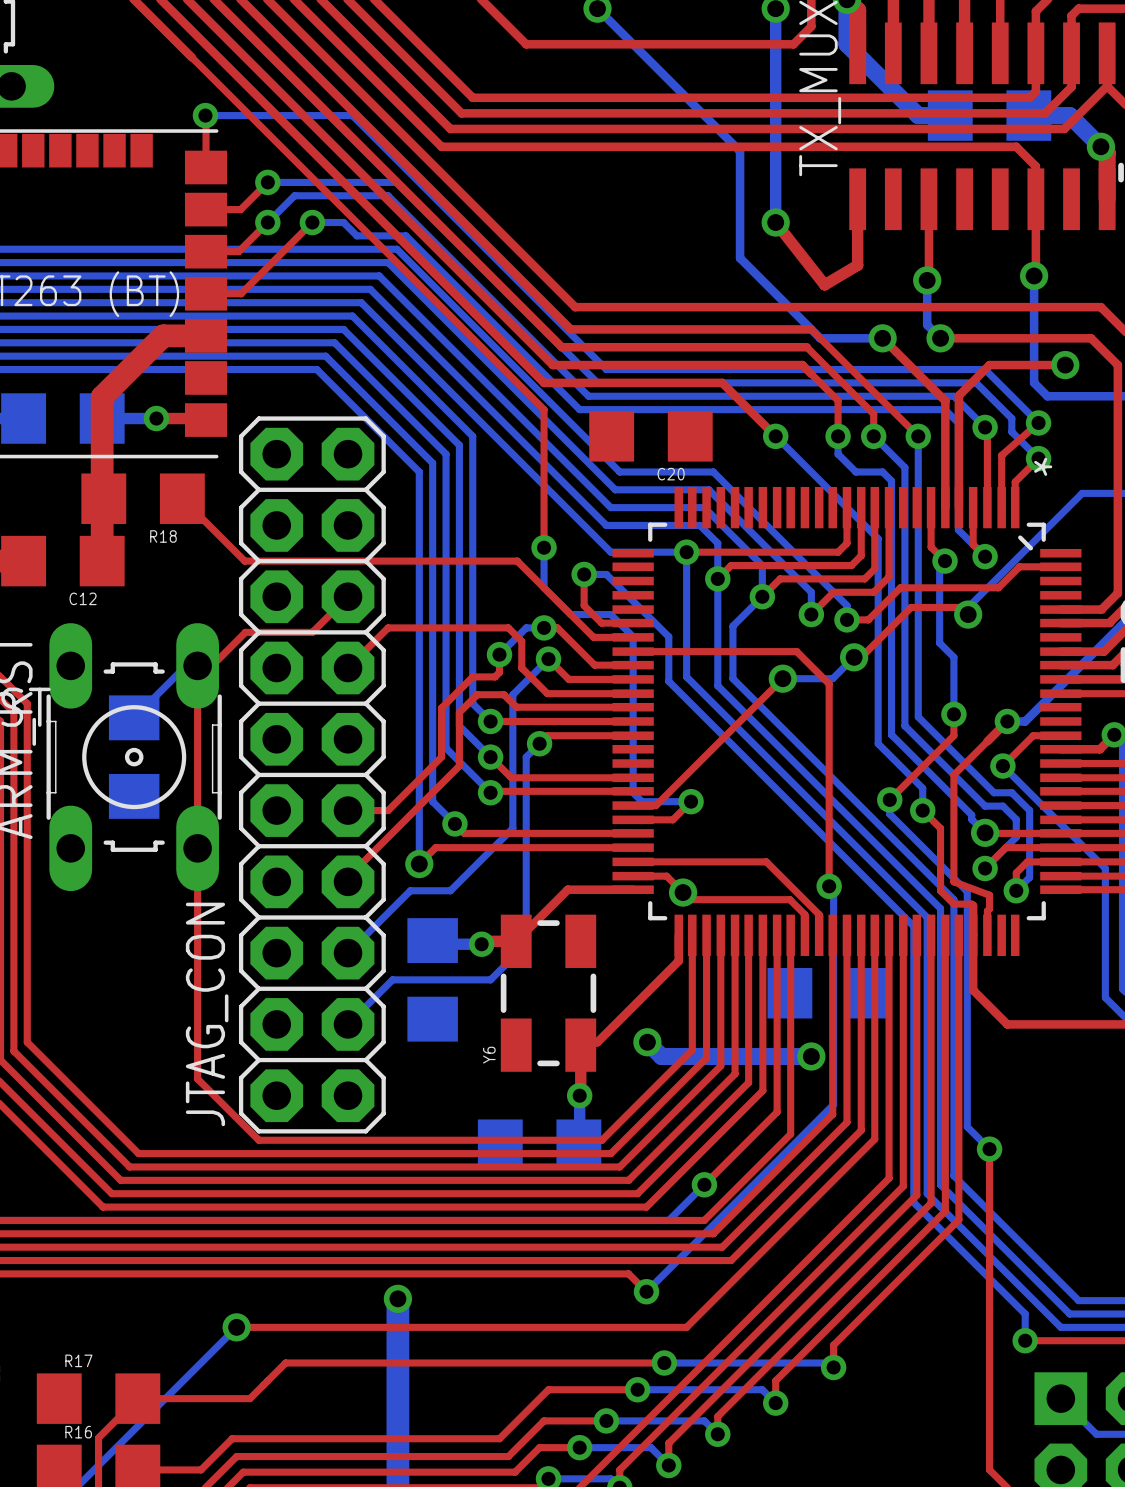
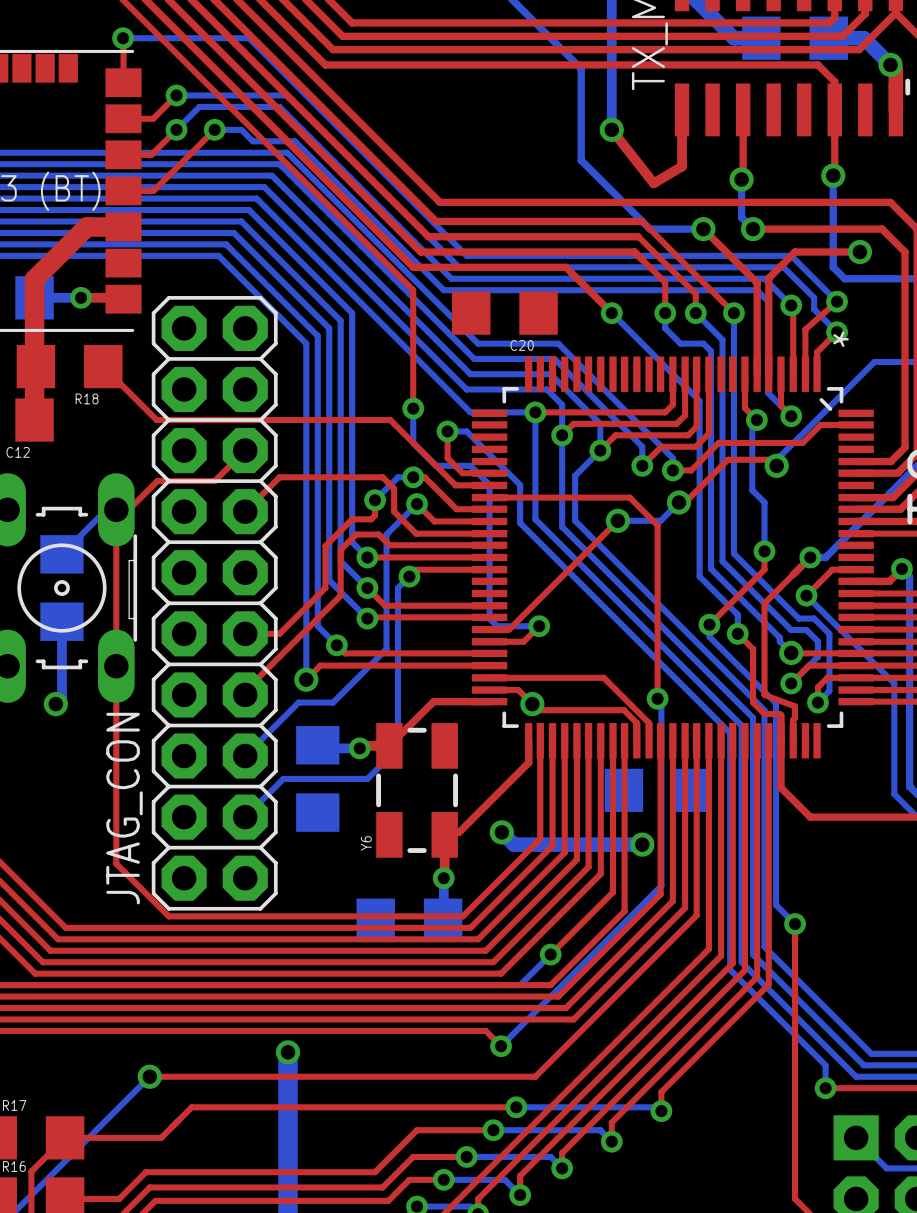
bottom track: none -> (61, 621) (61, 697) (55, 704)
via: none -> (55, 704)

